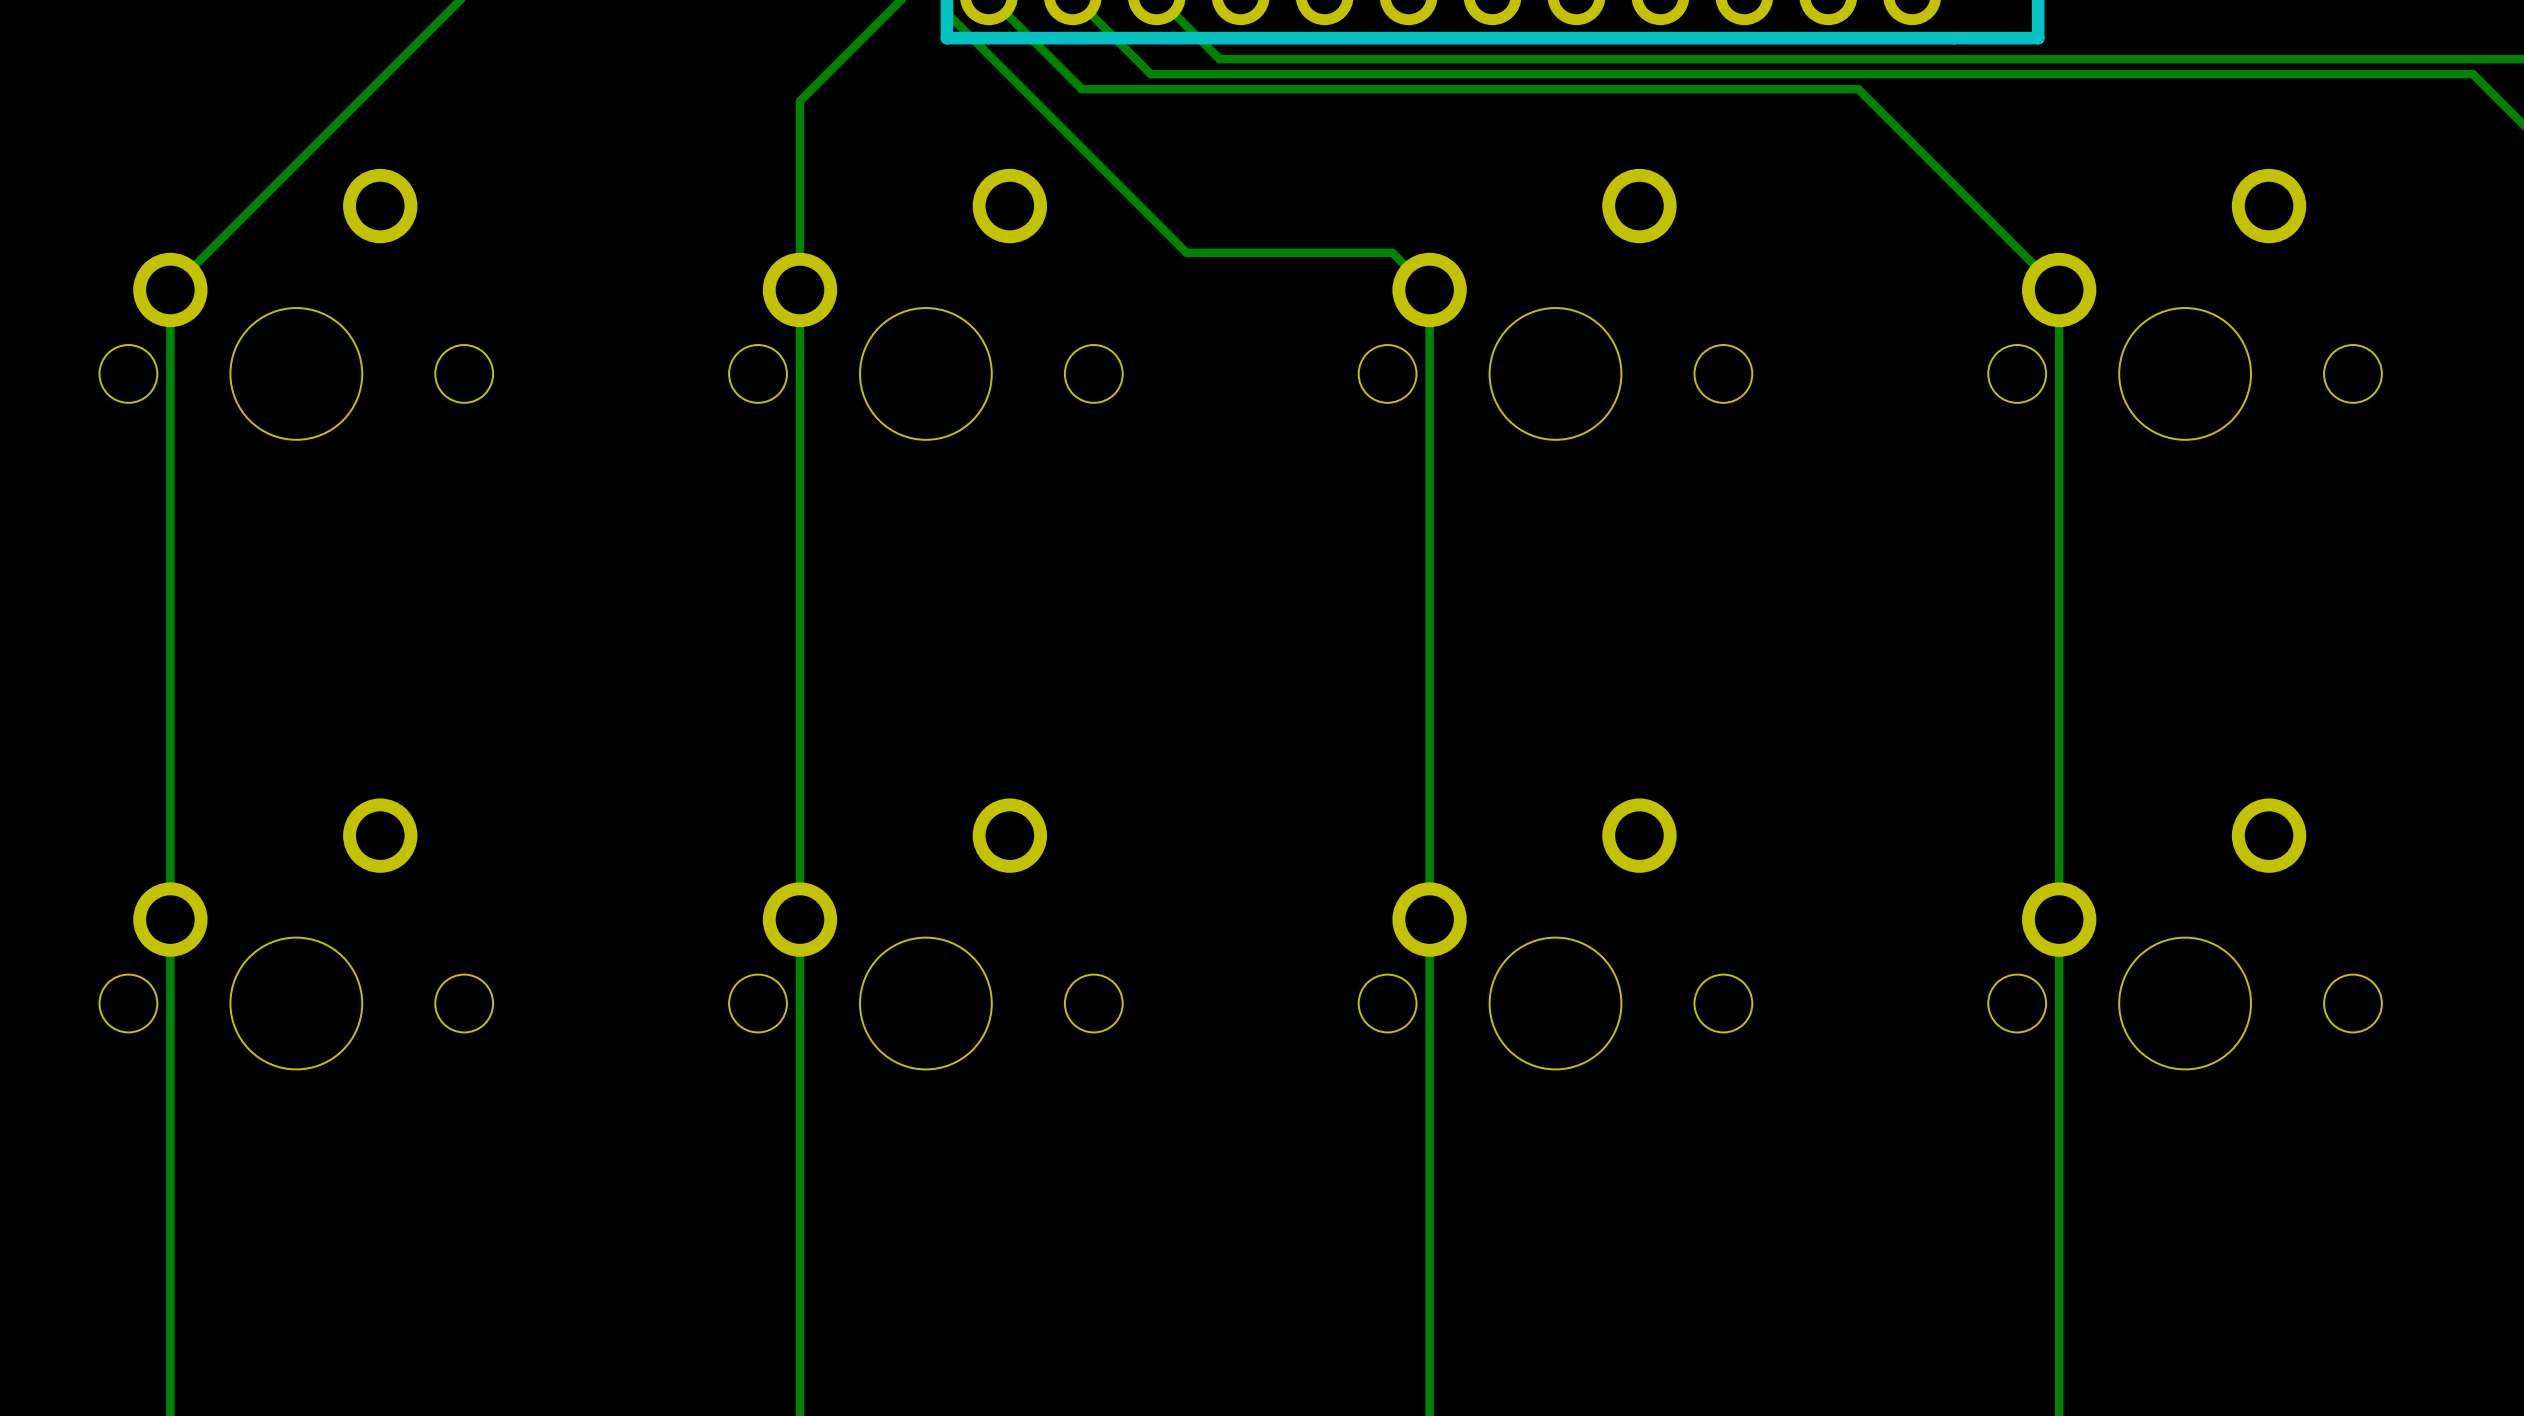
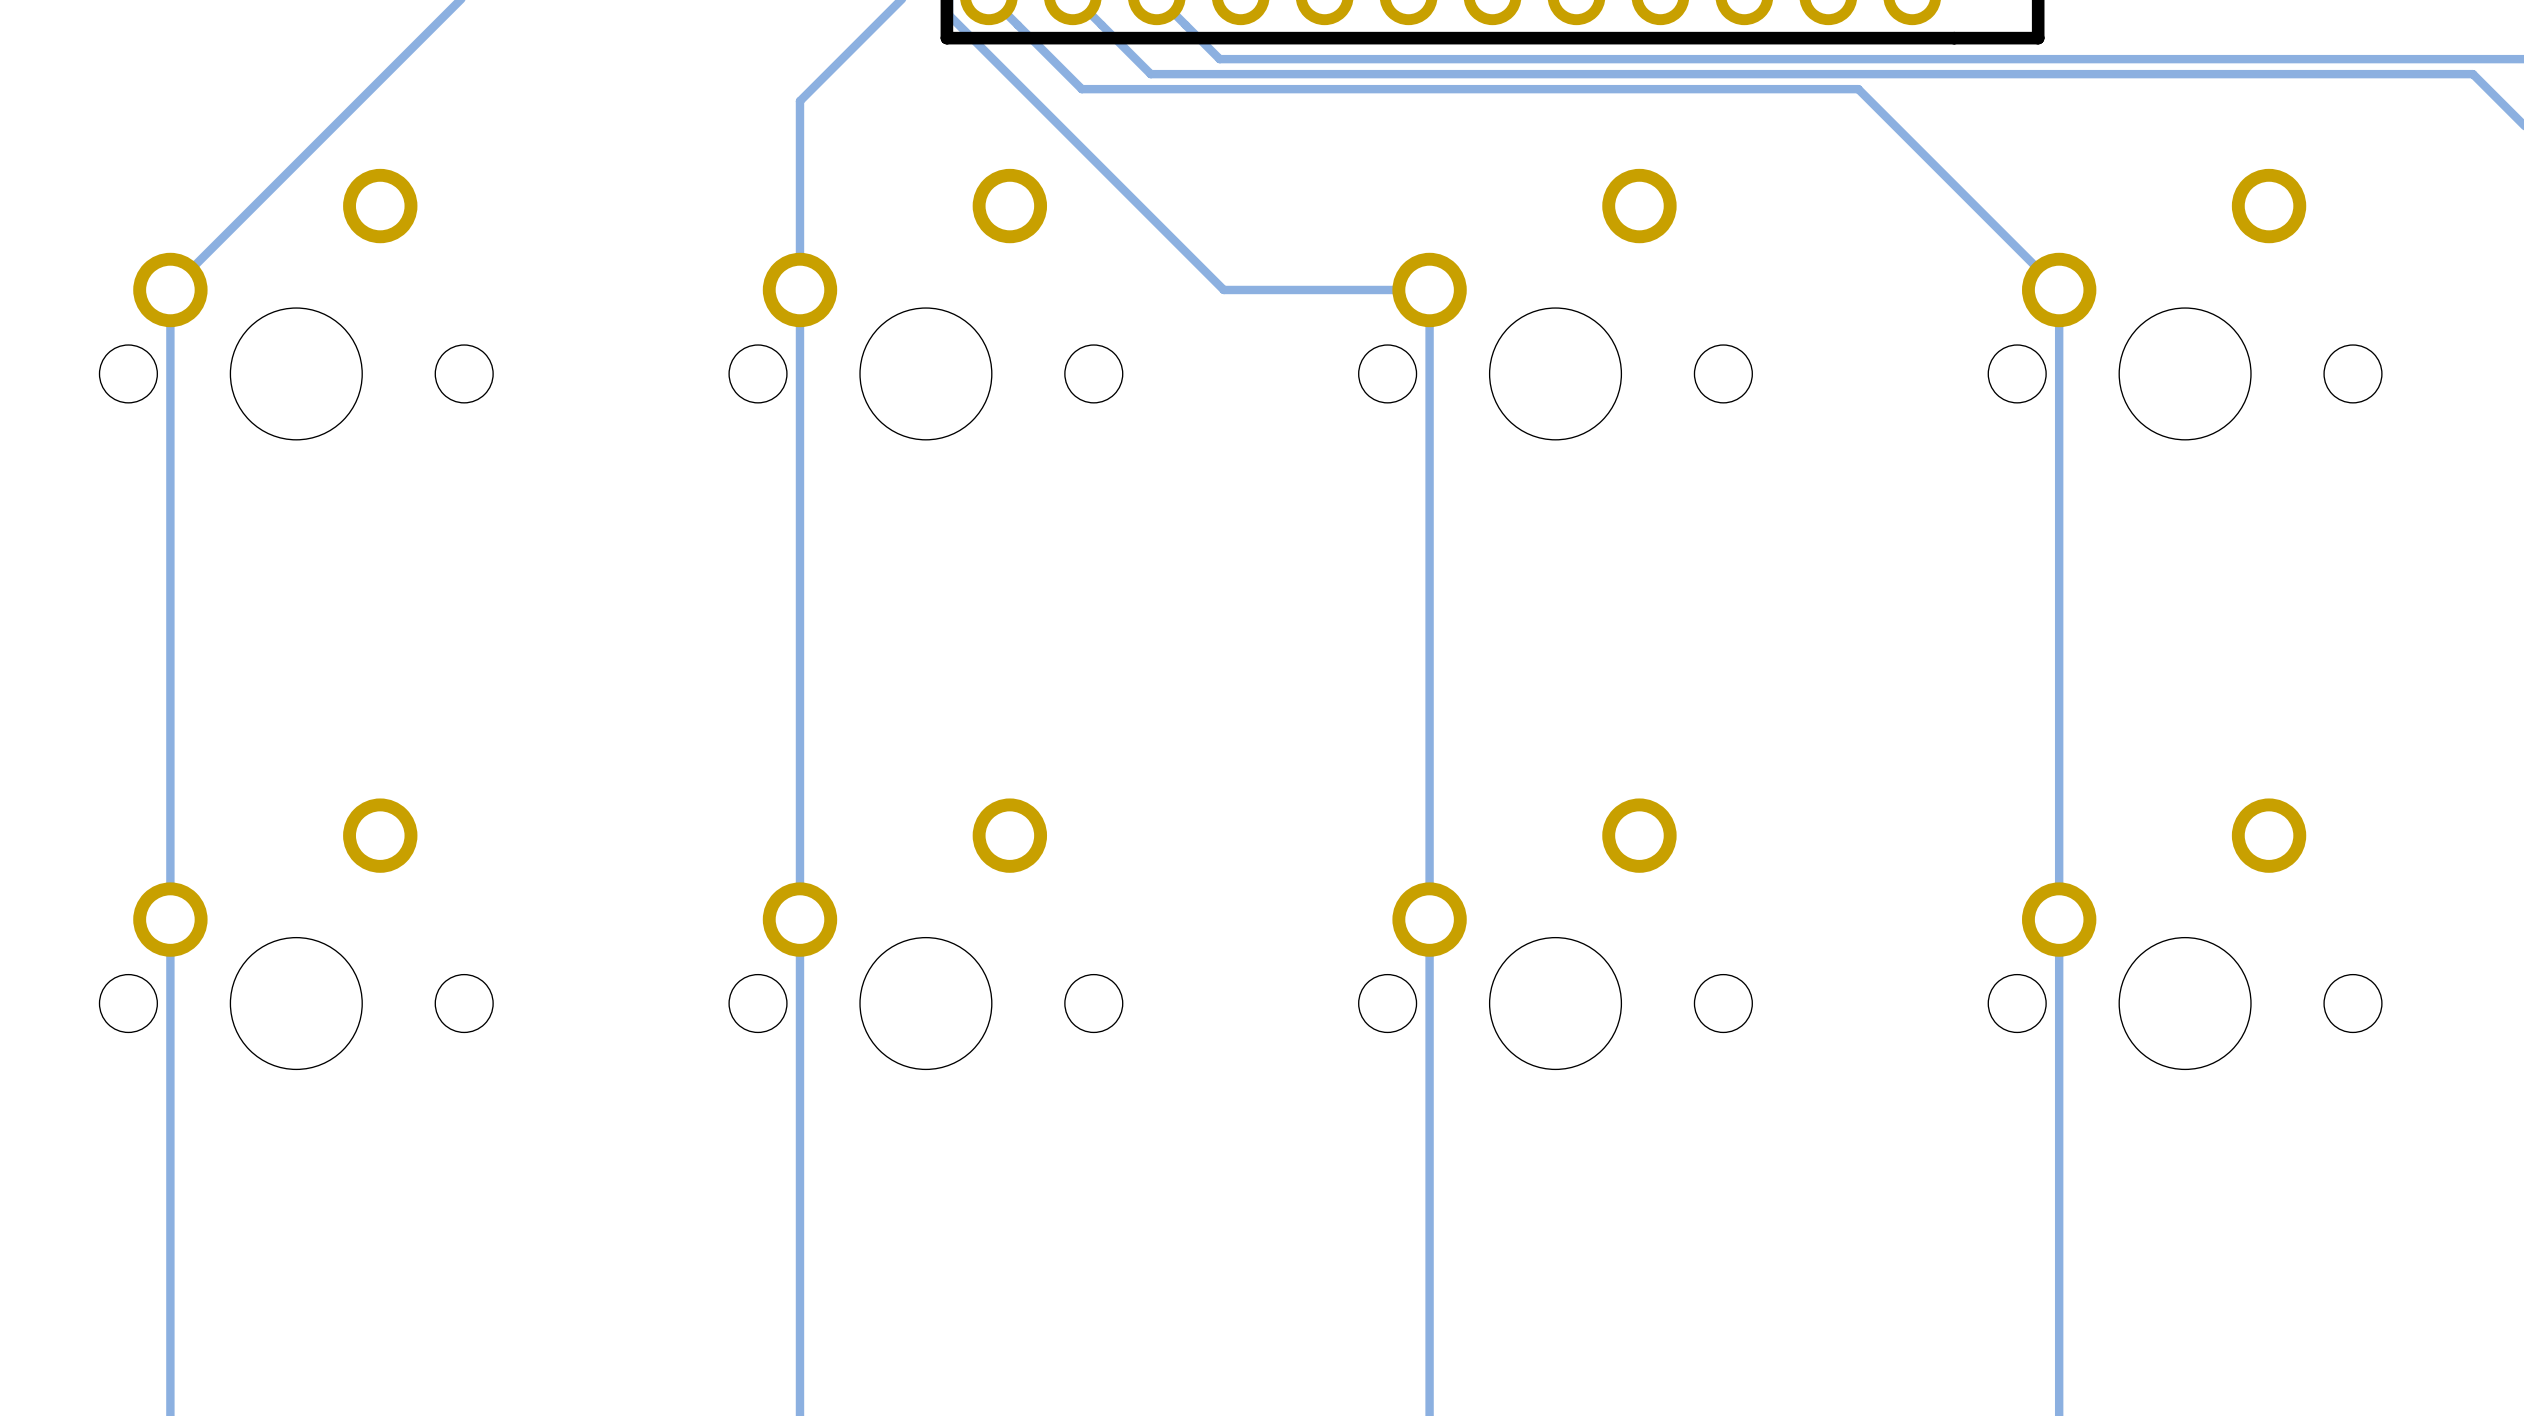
track: (1186, 252) (1392, 252) (1429, 289) -> (1186, 252) (1223, 289) (1429, 289)

